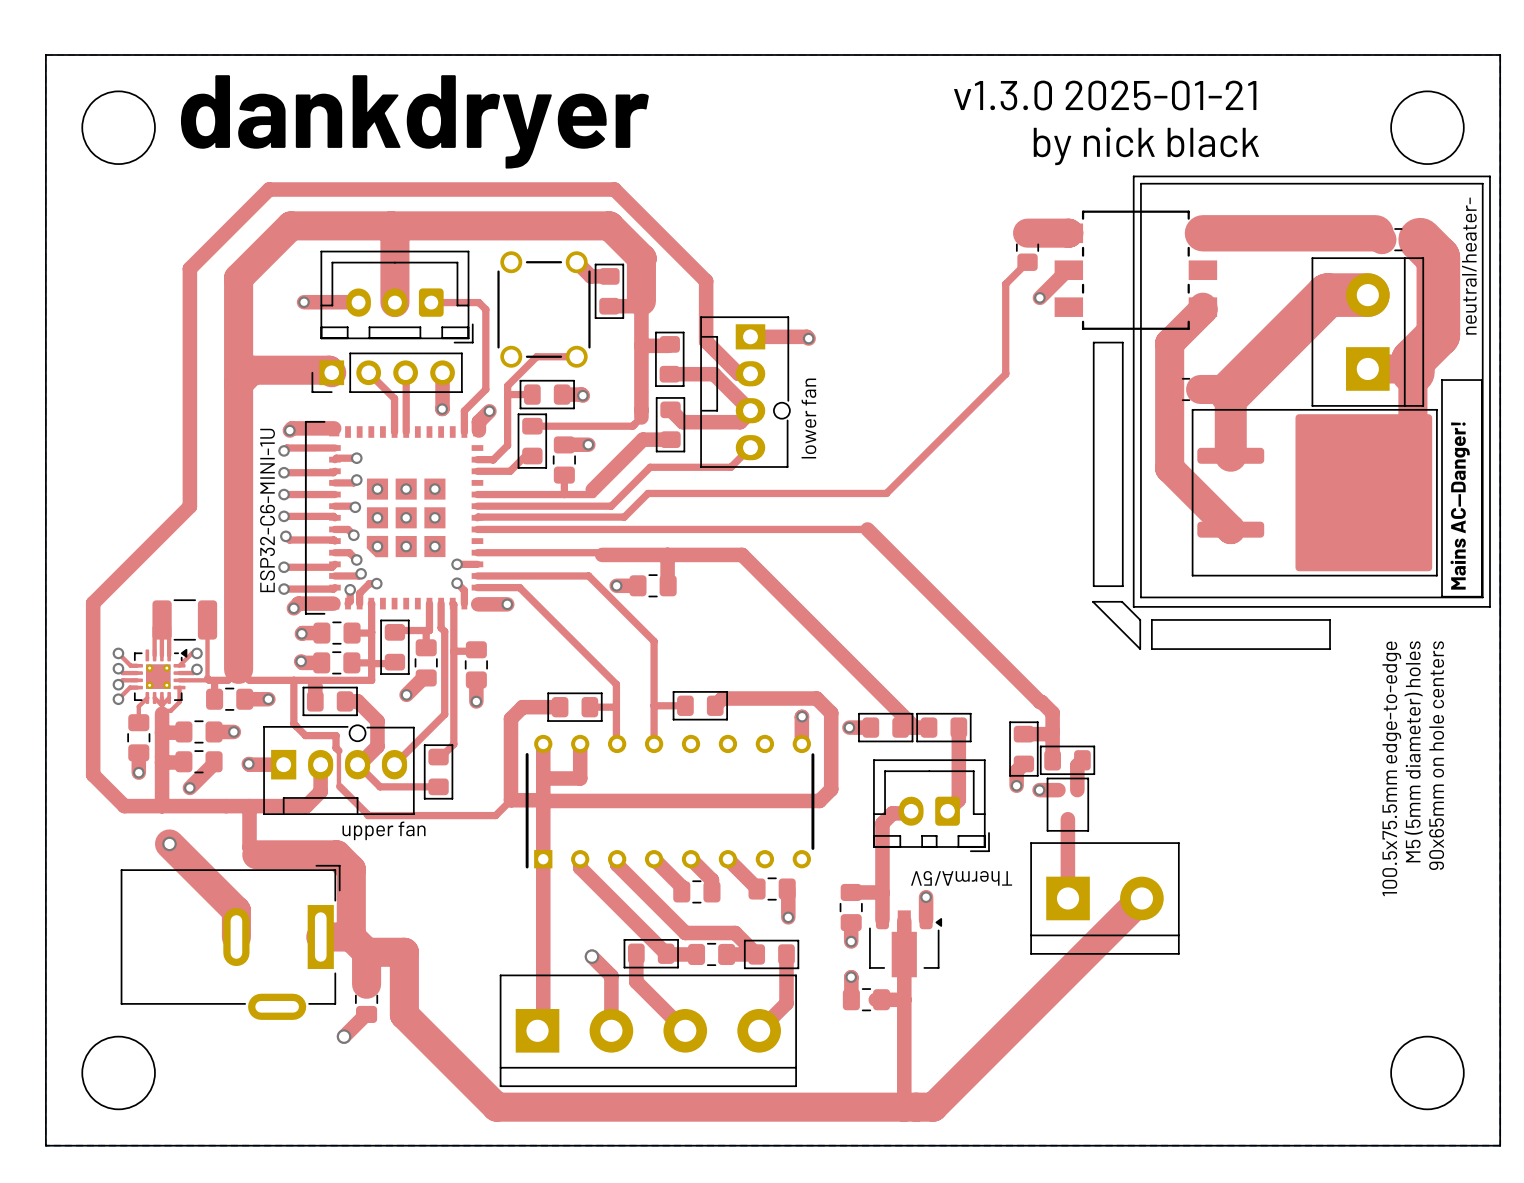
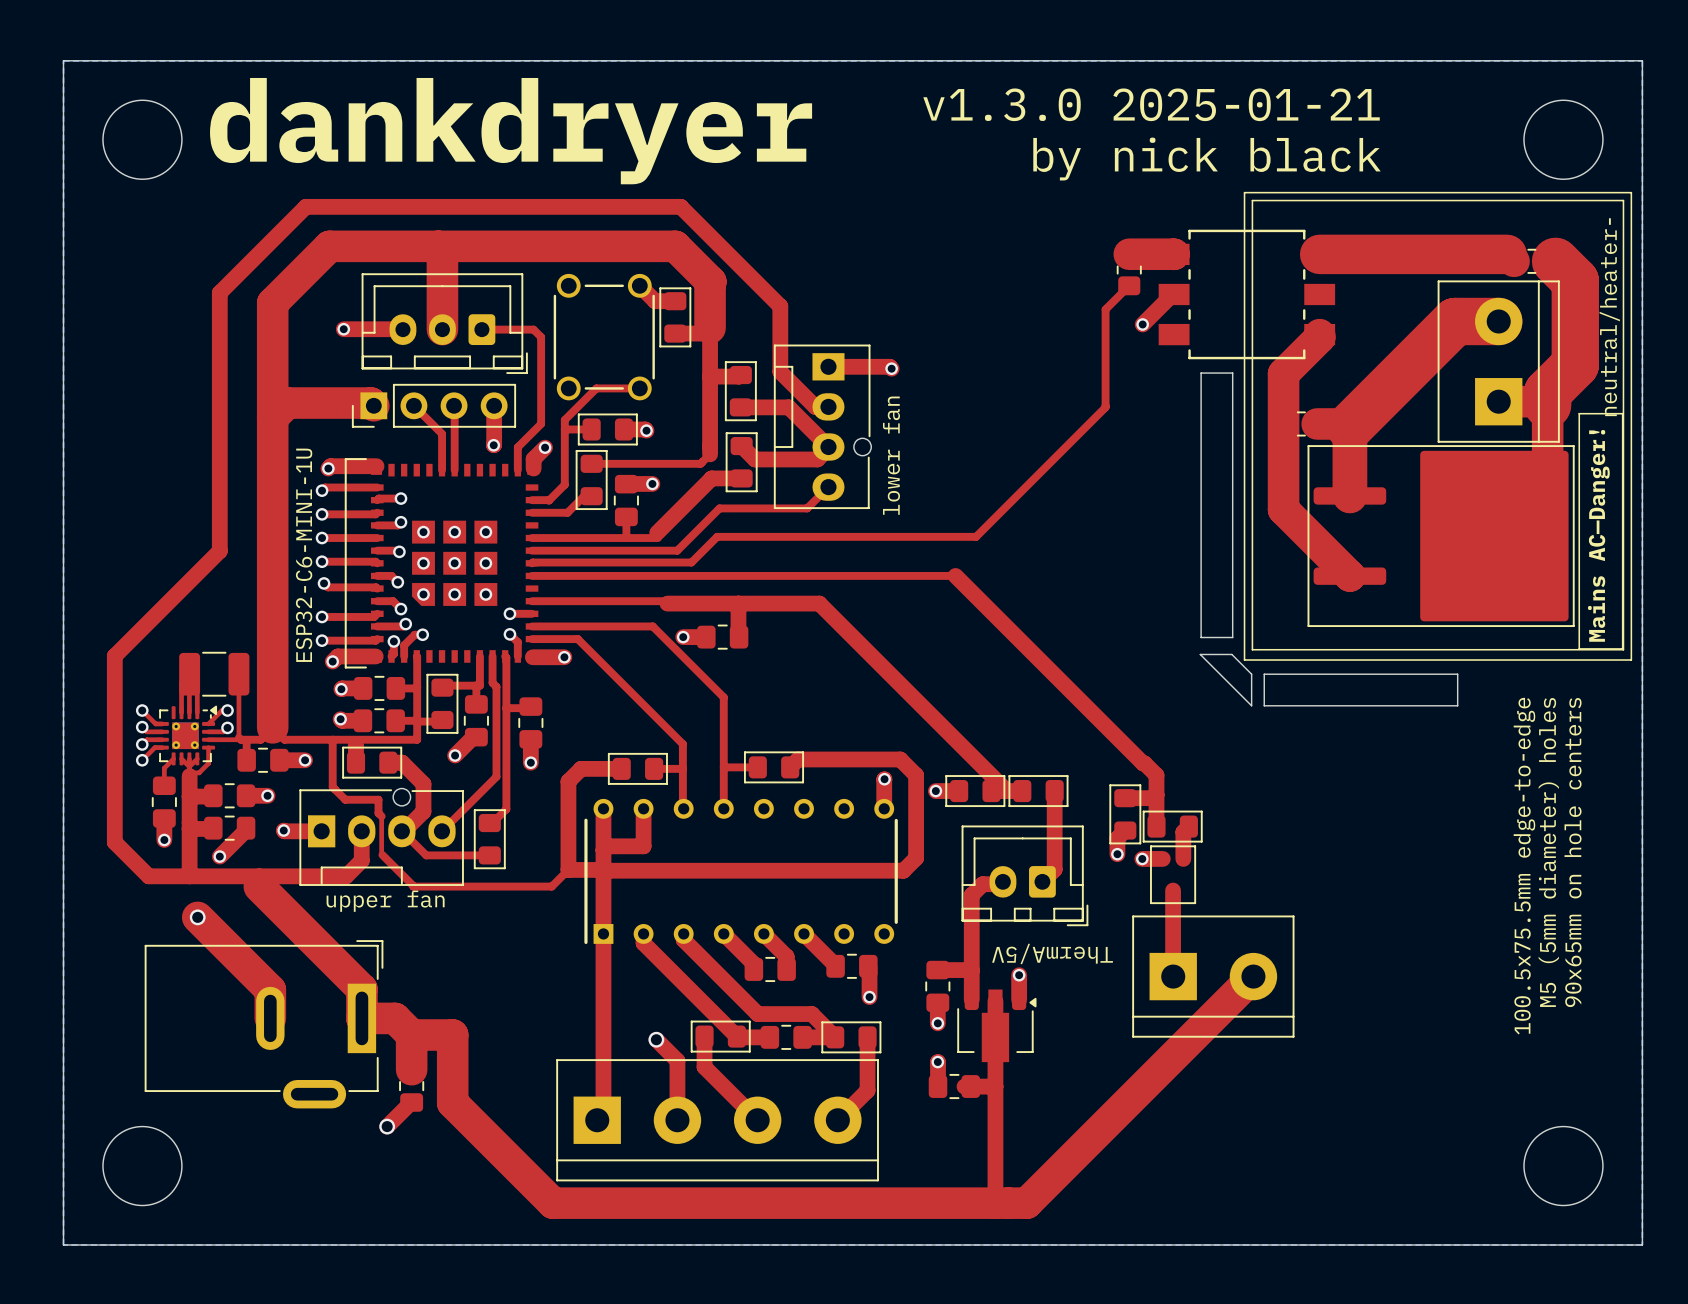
top track: (249, 806) (249, 847) (256, 854) (336, 854) (351, 869) (351, 937) -> none
top track: none -> (259, 886) (361, 989) (361, 1018)
part value position: upper fan (384, 830) -> upper fan (385, 901)

